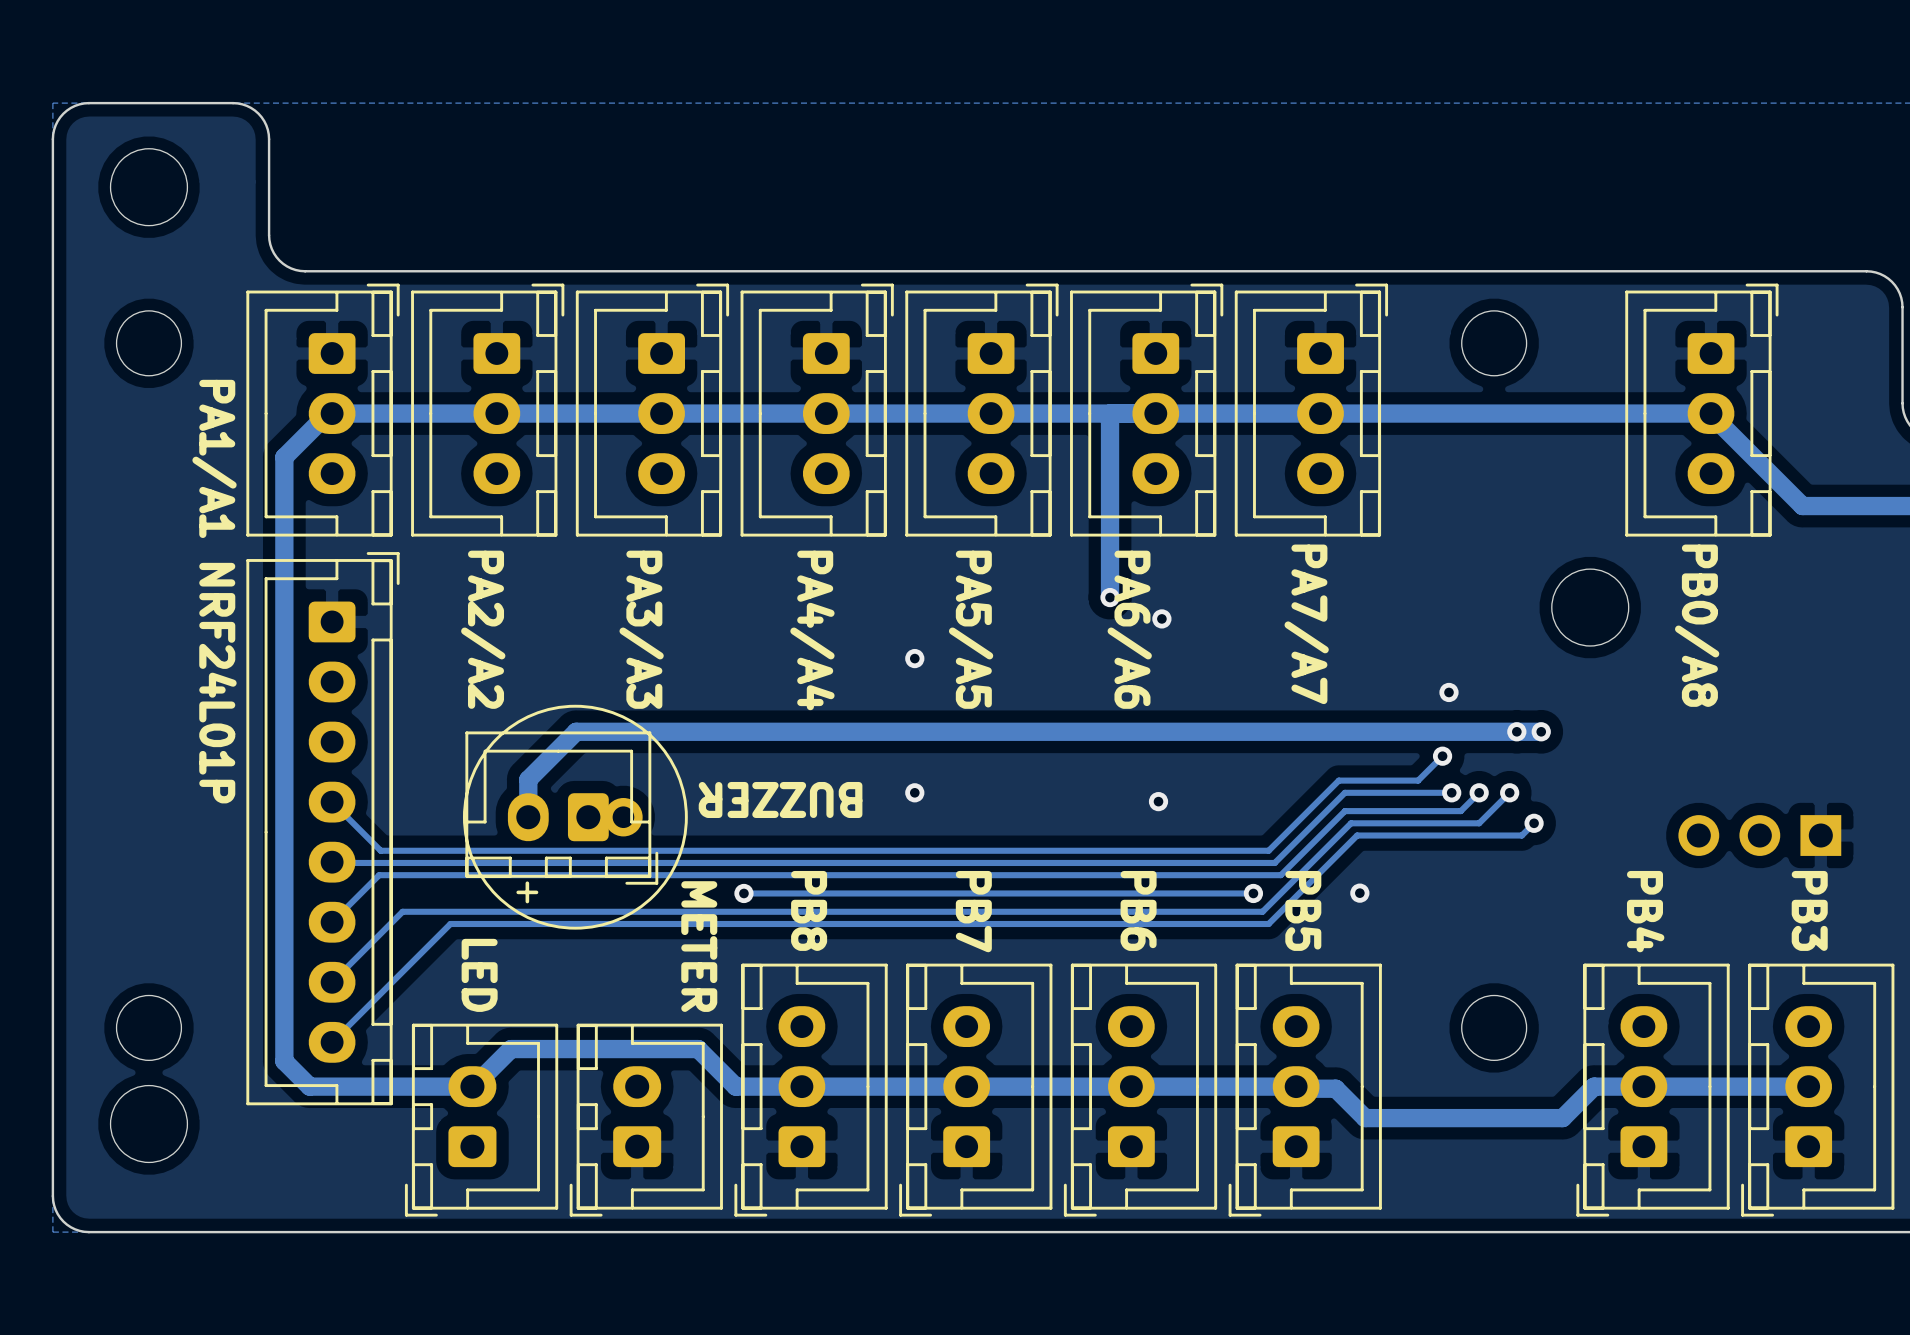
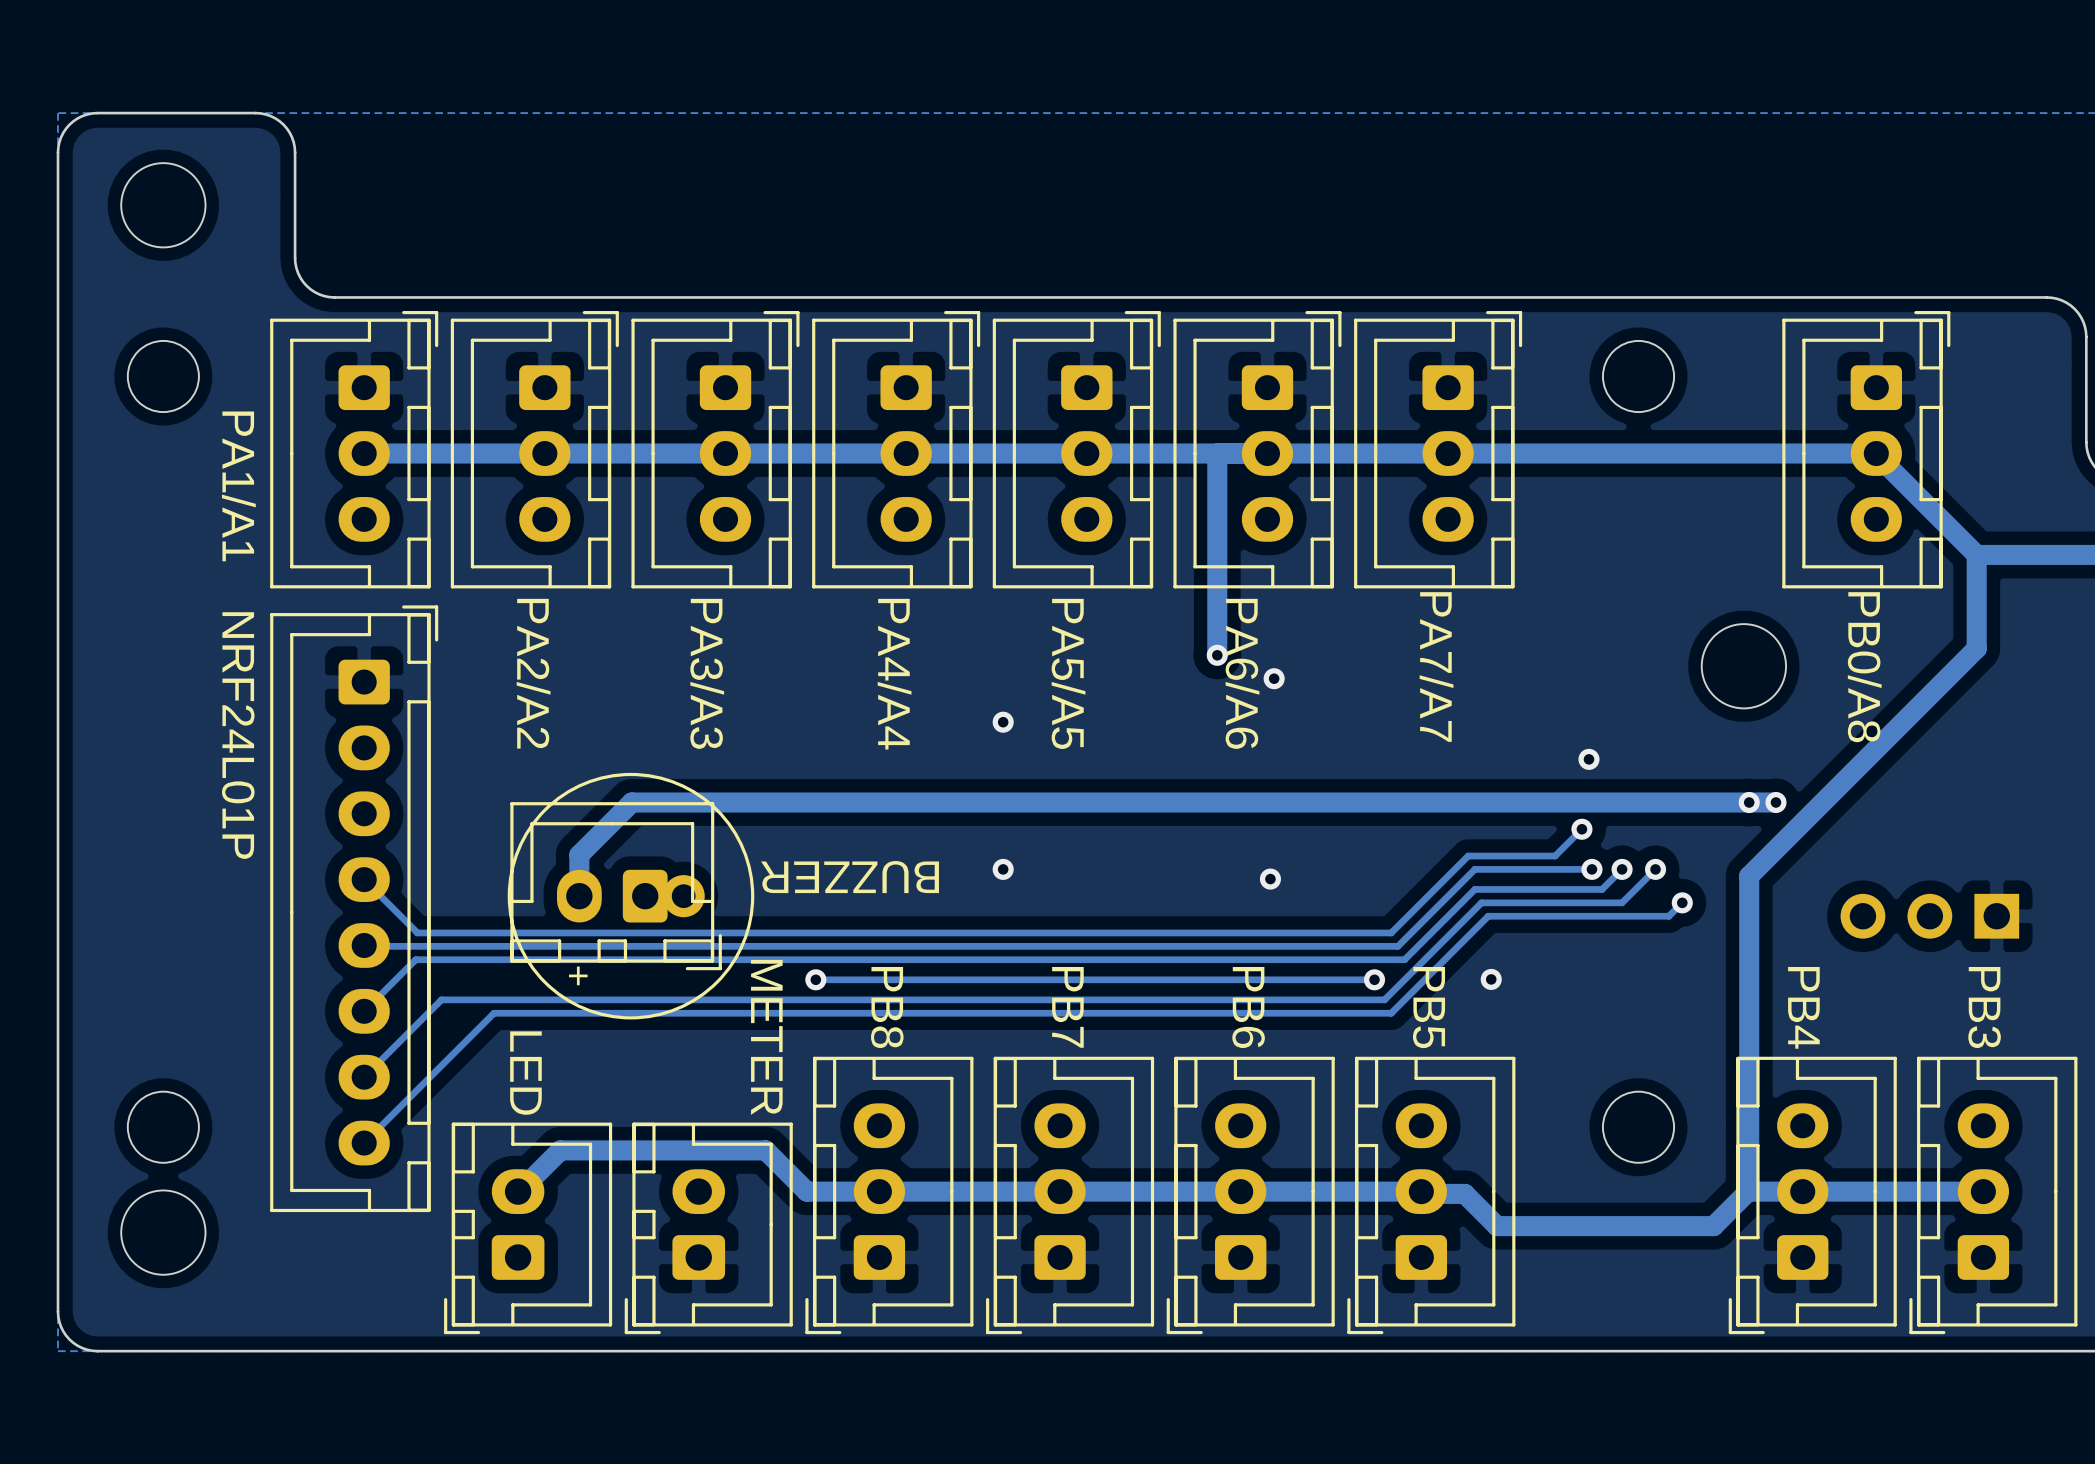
track: (332, 413) (328, 413) (284, 457) (284, 1061) (309, 1086) (472, 1086) -> none
track: none -> (1976, 554) (1976, 648) (1749, 876) (1749, 1191)
via: (1516, 731) -> none
via: (1541, 731) -> none
via: none -> (1749, 802)
track: none -> (1775, 802) (1690, 802)
via: none -> (1775, 802)

